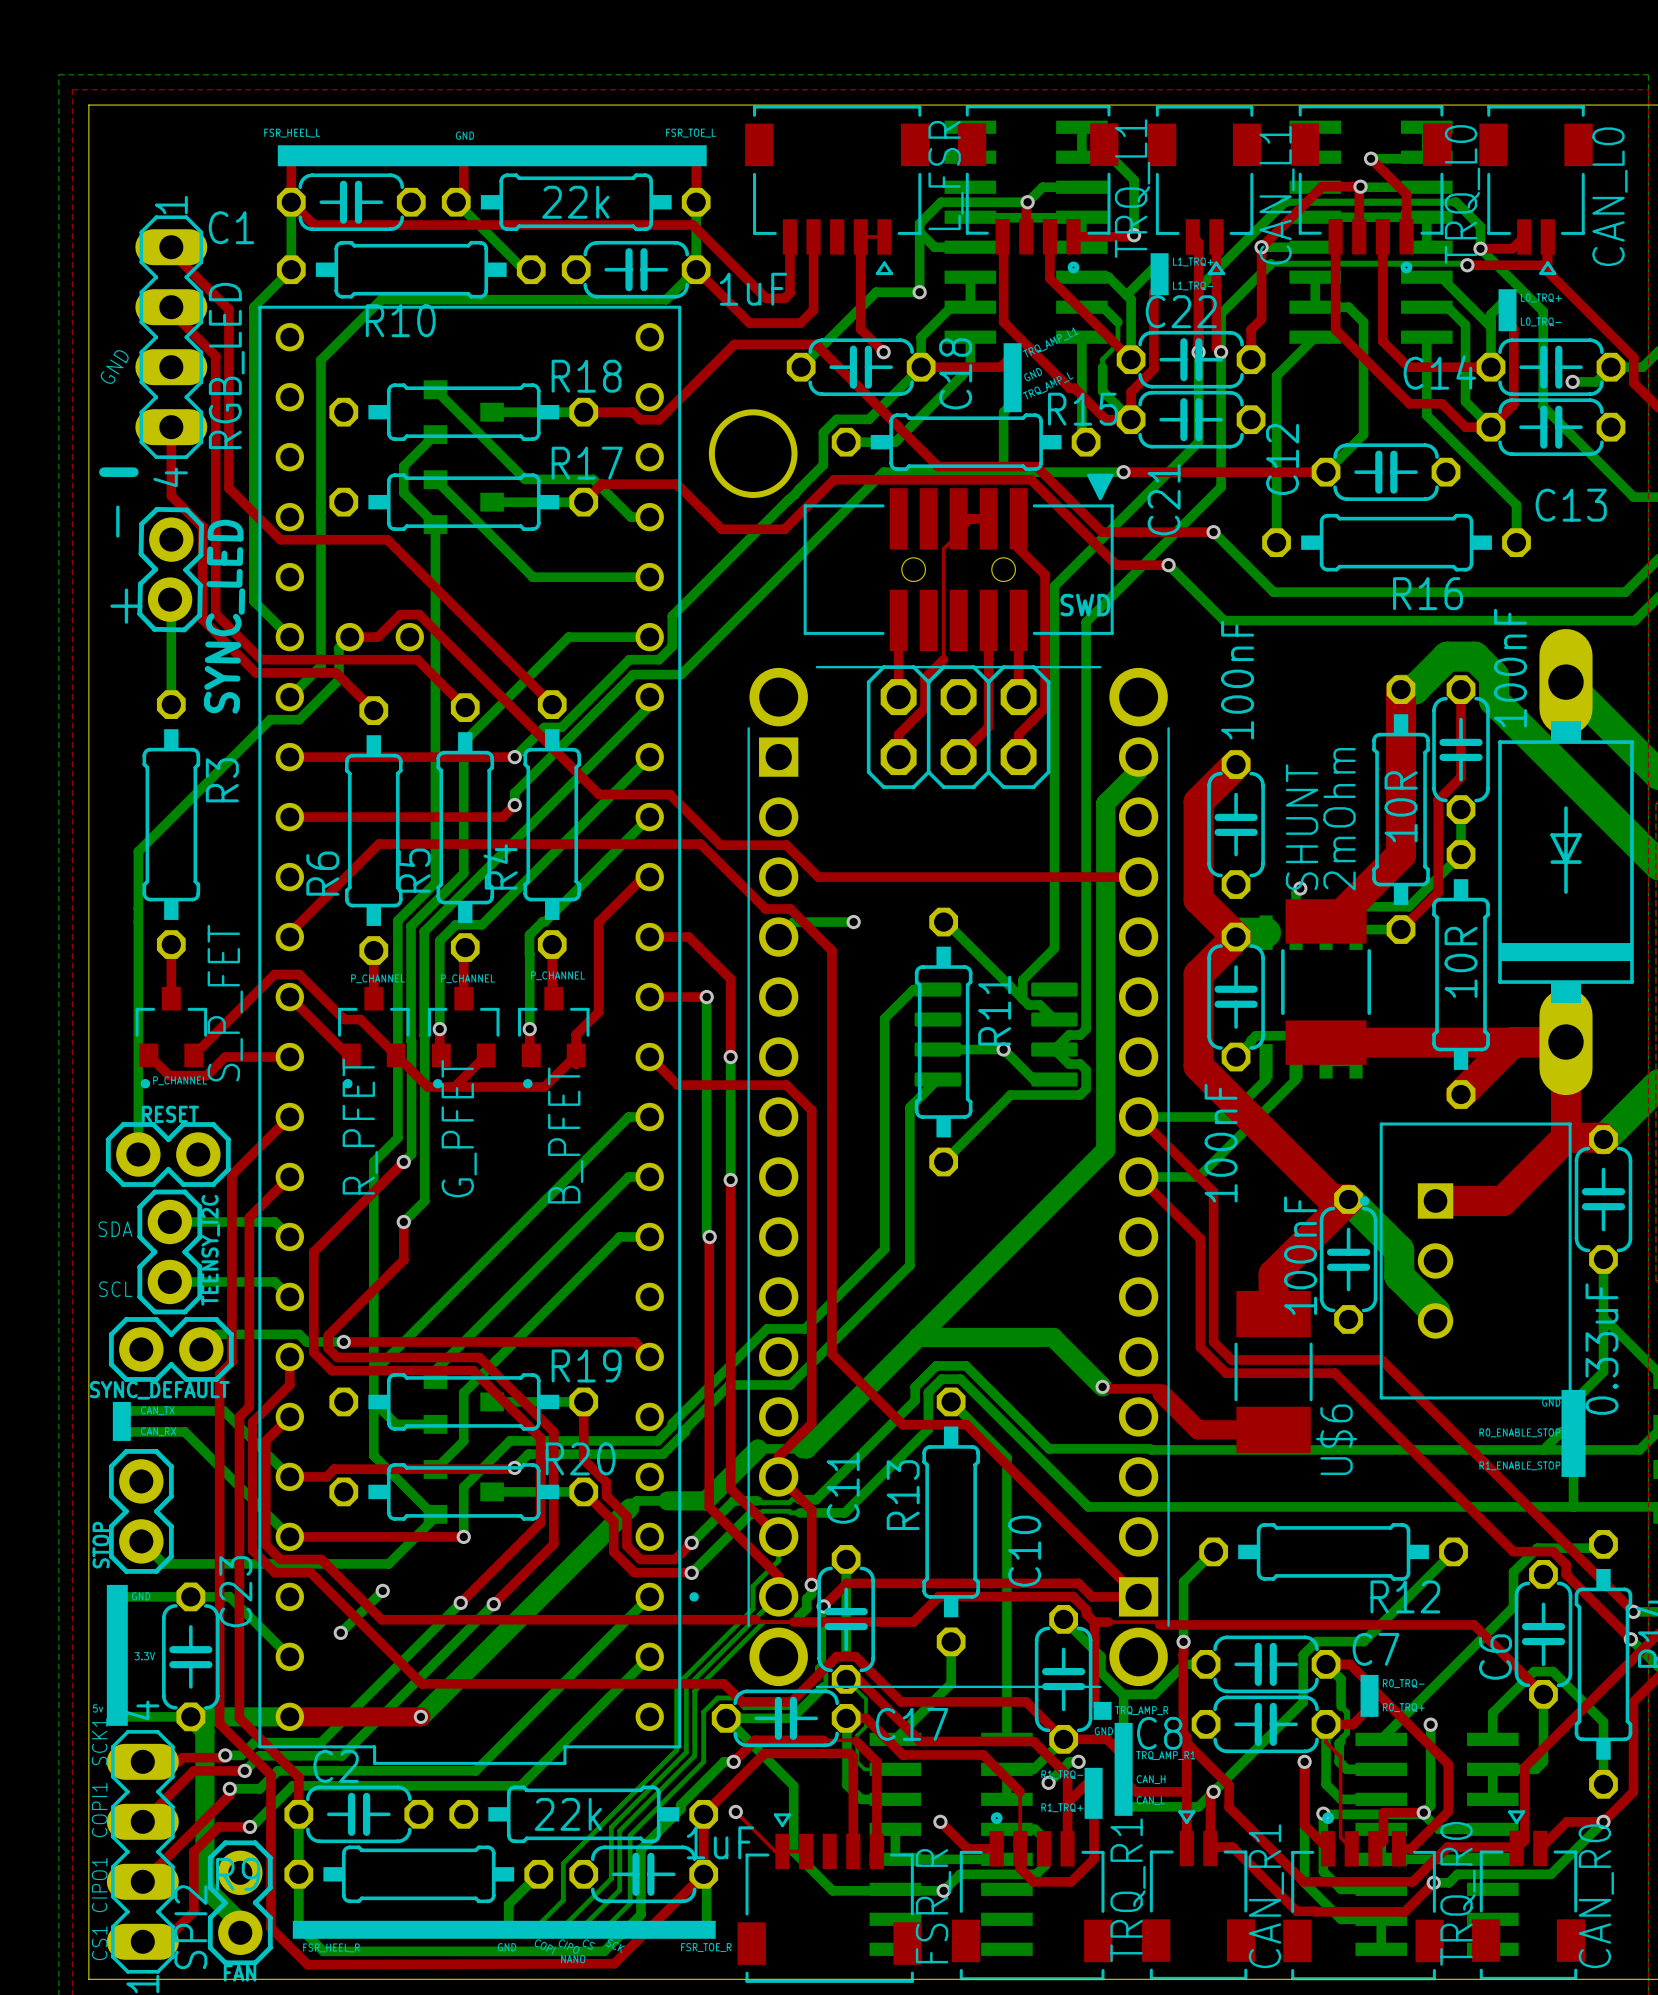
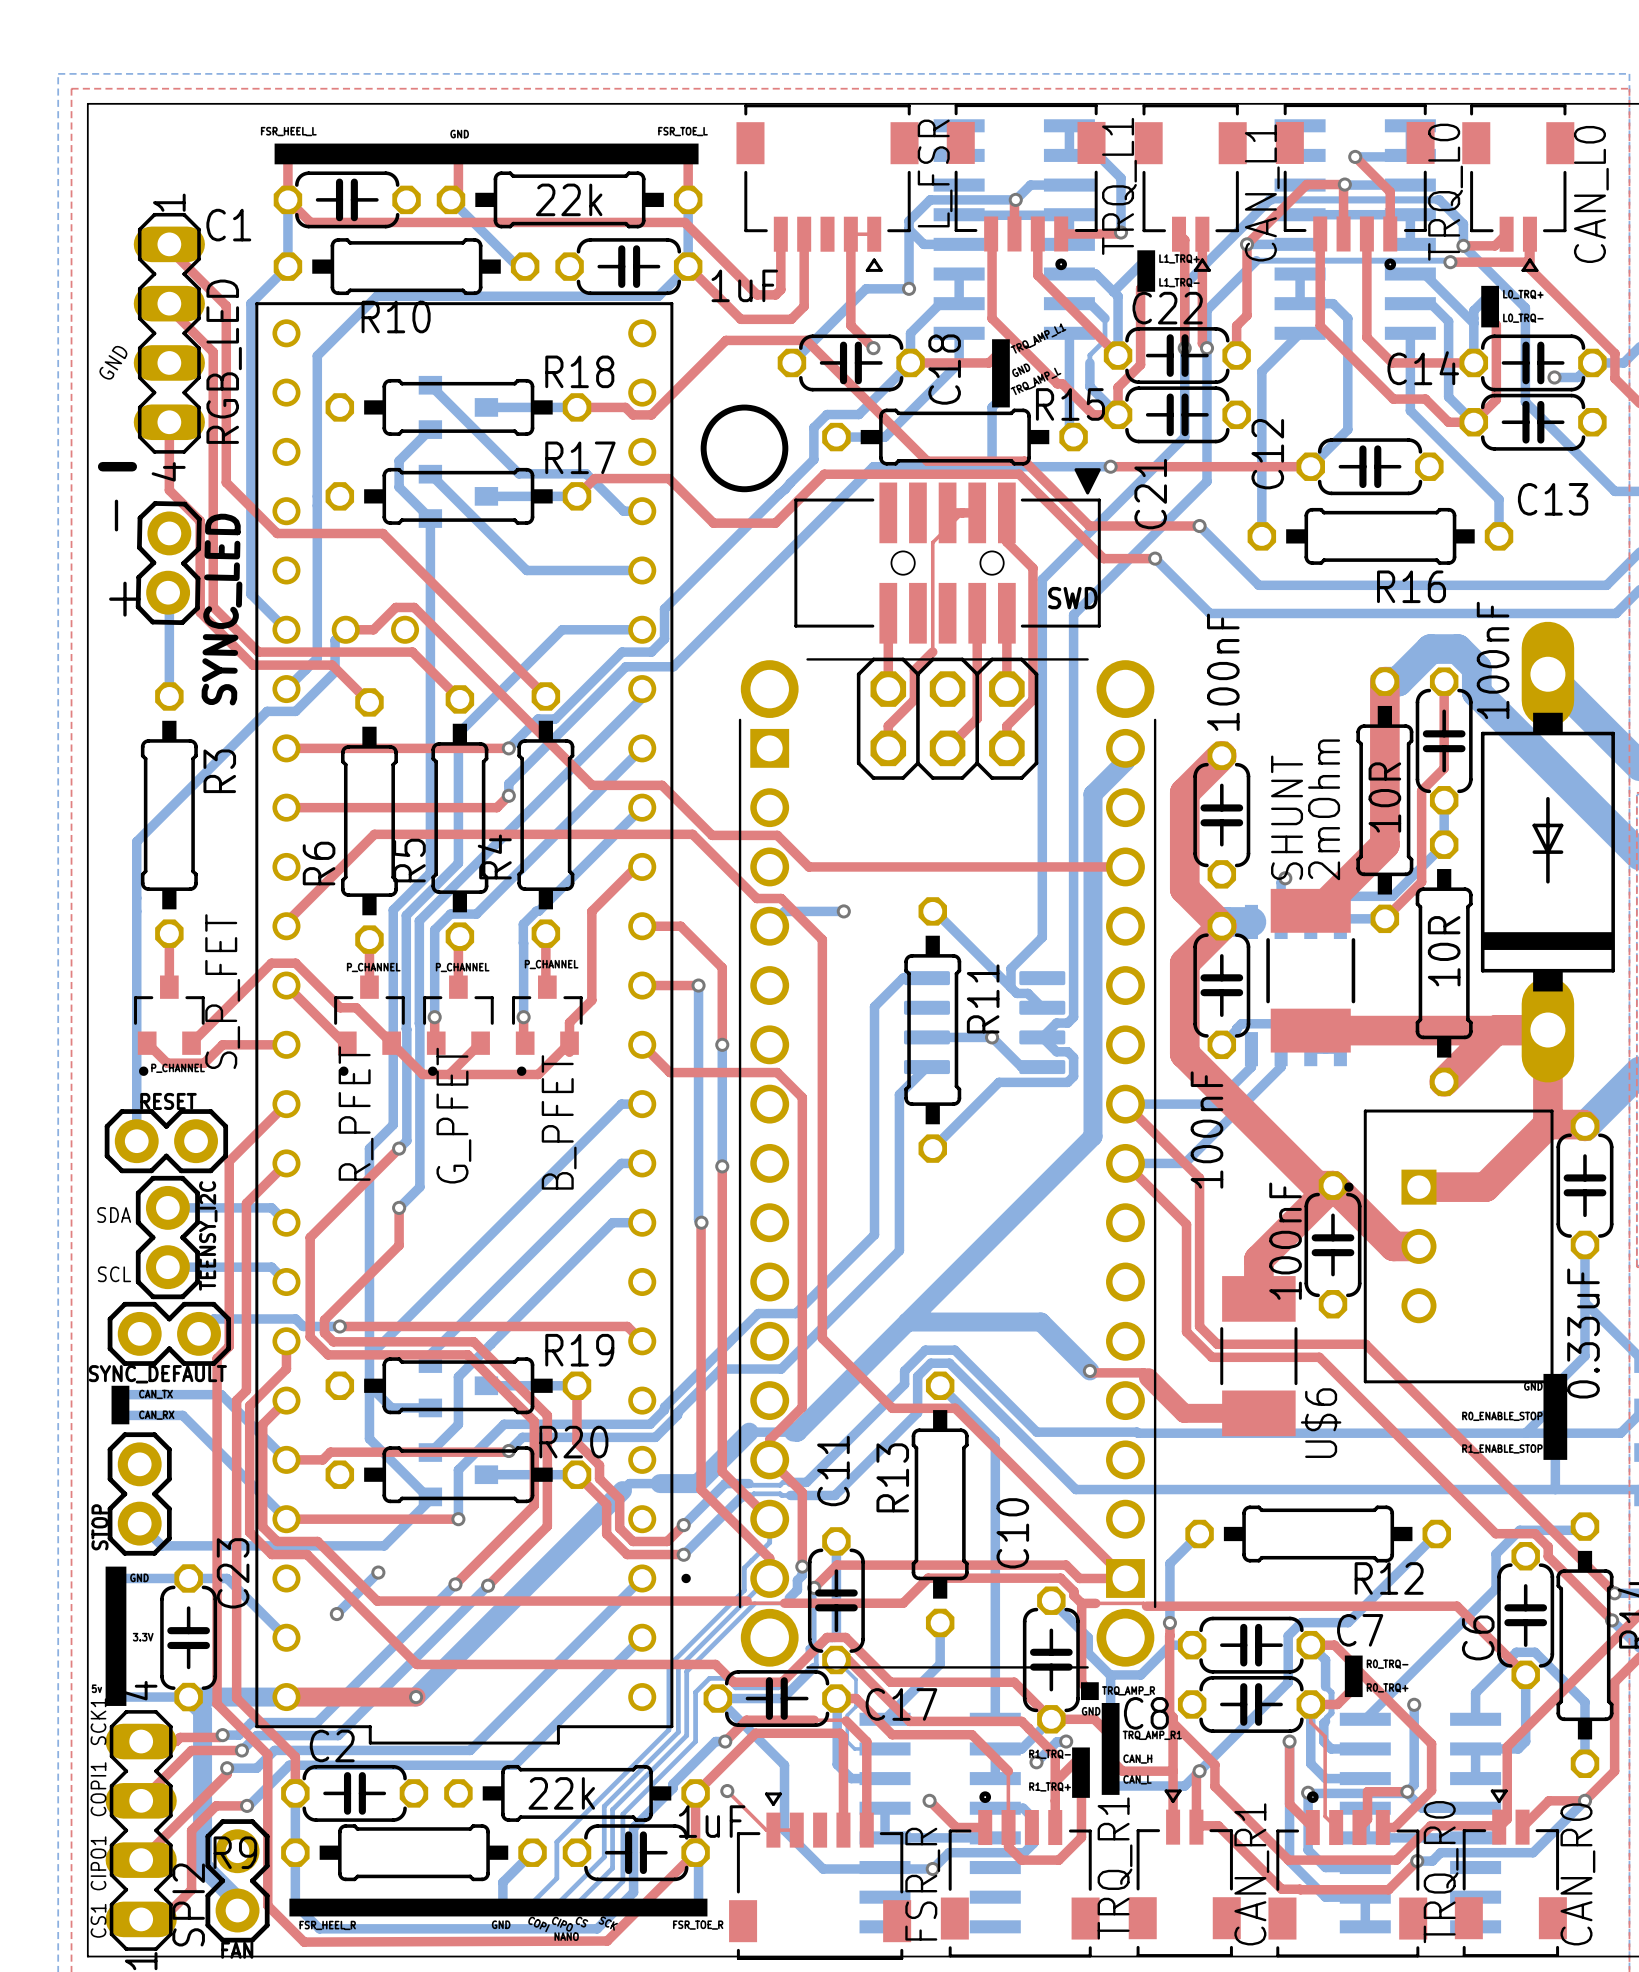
bottom track: (1348, 1199) (1399, 1250) (1399, 1276) (1435, 1312) (1435, 1320) -> none
top track: none -> (1332, 1185) (1393, 1246) (1418, 1246)

